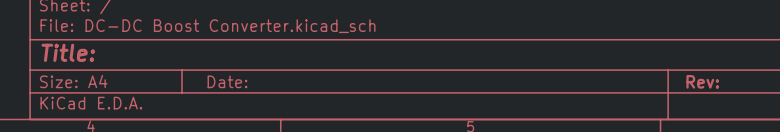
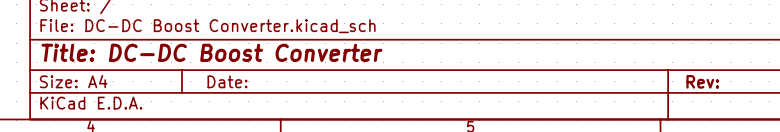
title block: Title: (68, 52) -> Title: DC-DC Boost Converter (211, 52)

